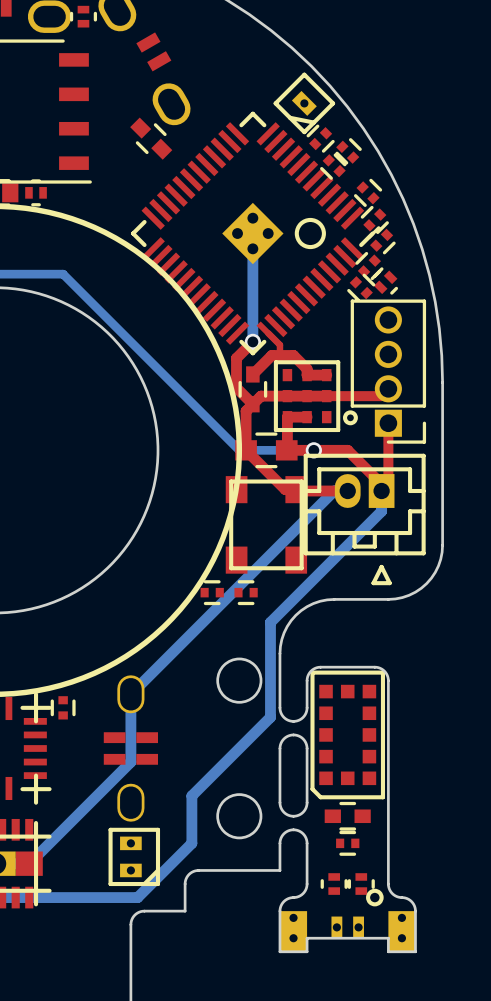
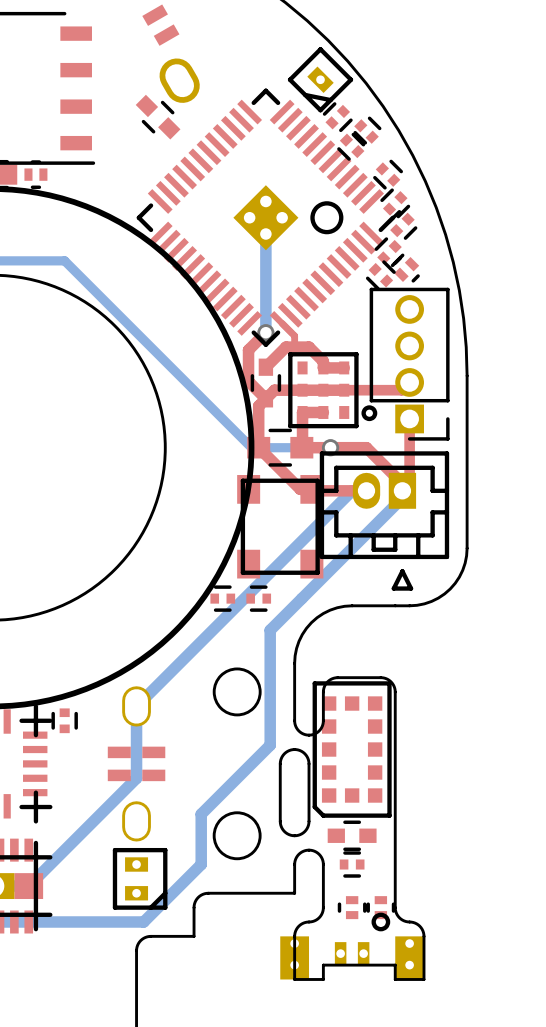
bottom track: (381, 497) (381, 511) (270, 622) (270, 717) (256, 730) -> (402, 498) (270, 630) (270, 745)
board edge: (361, 667) (380, 668) (385, 672) (388, 678) (388, 885) (393, 894) (411, 901) (415, 911) (415, 951) (401, 951) -> (380, 677) (391, 681) (395, 692) (395, 909) (400, 919) (416, 923) (422, 930) (423, 979)
round board edge position: (239, 680) -> (237, 691)
board edge: (293, 734) (303, 738) (307, 748) (306, 806) (301, 813) (293, 816) (283, 812) (279, 802) (280, 744) (285, 737) (293, 734) -> (294, 749) (304, 753) (309, 763) (308, 825) (303, 832) (294, 835) (284, 831) (280, 821) (280, 760) (285, 752) (294, 749)
part position: (347, 734) -> (352, 749)
round board edge position: (239, 816) -> (237, 835)
part position: (347, 816) -> (352, 835)
part position: (347, 843) -> (352, 864)
part position: (347, 920) -> (352, 946)
board edge: (374, 938) (388, 938) (388, 951) -> (395, 965) (395, 979) (409, 979)

